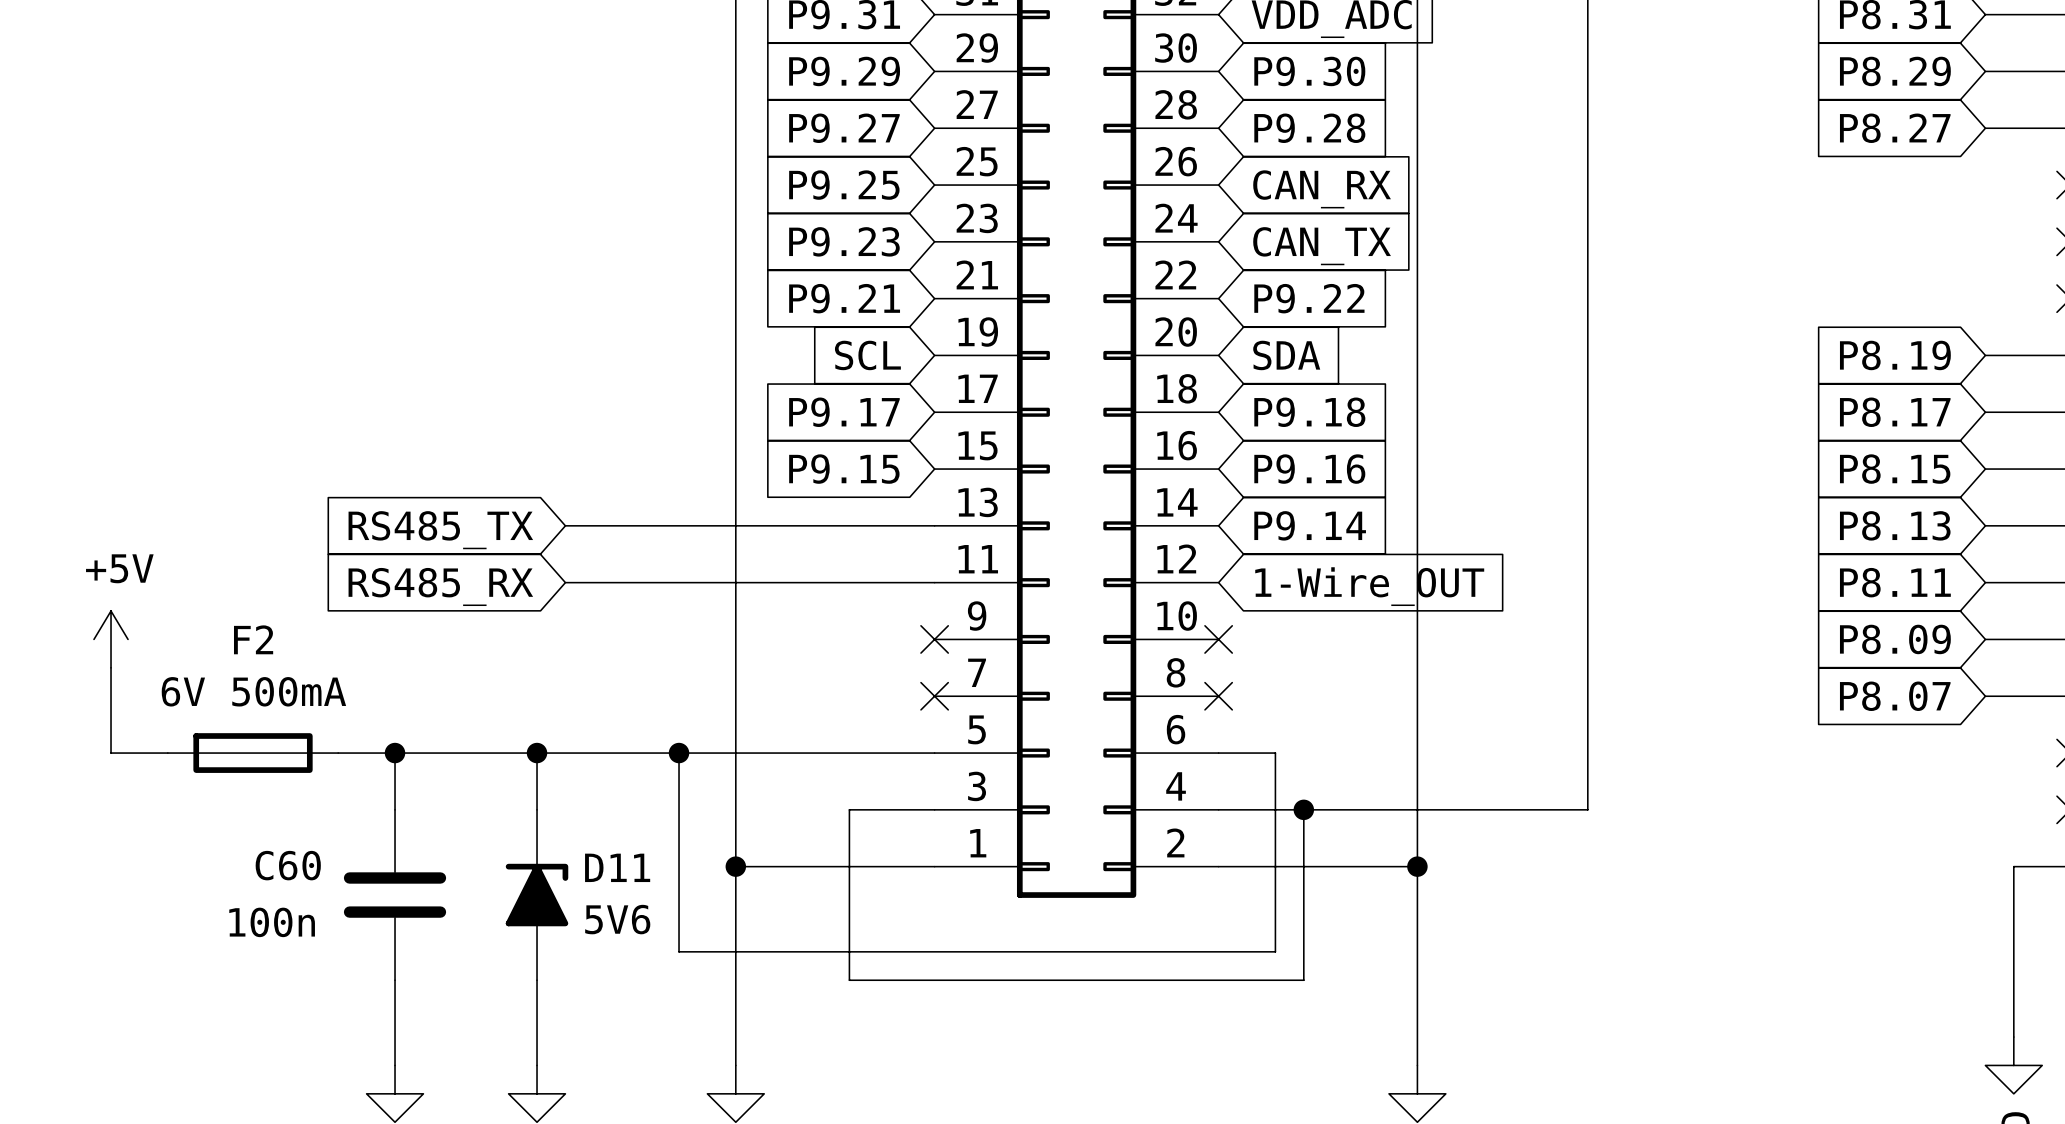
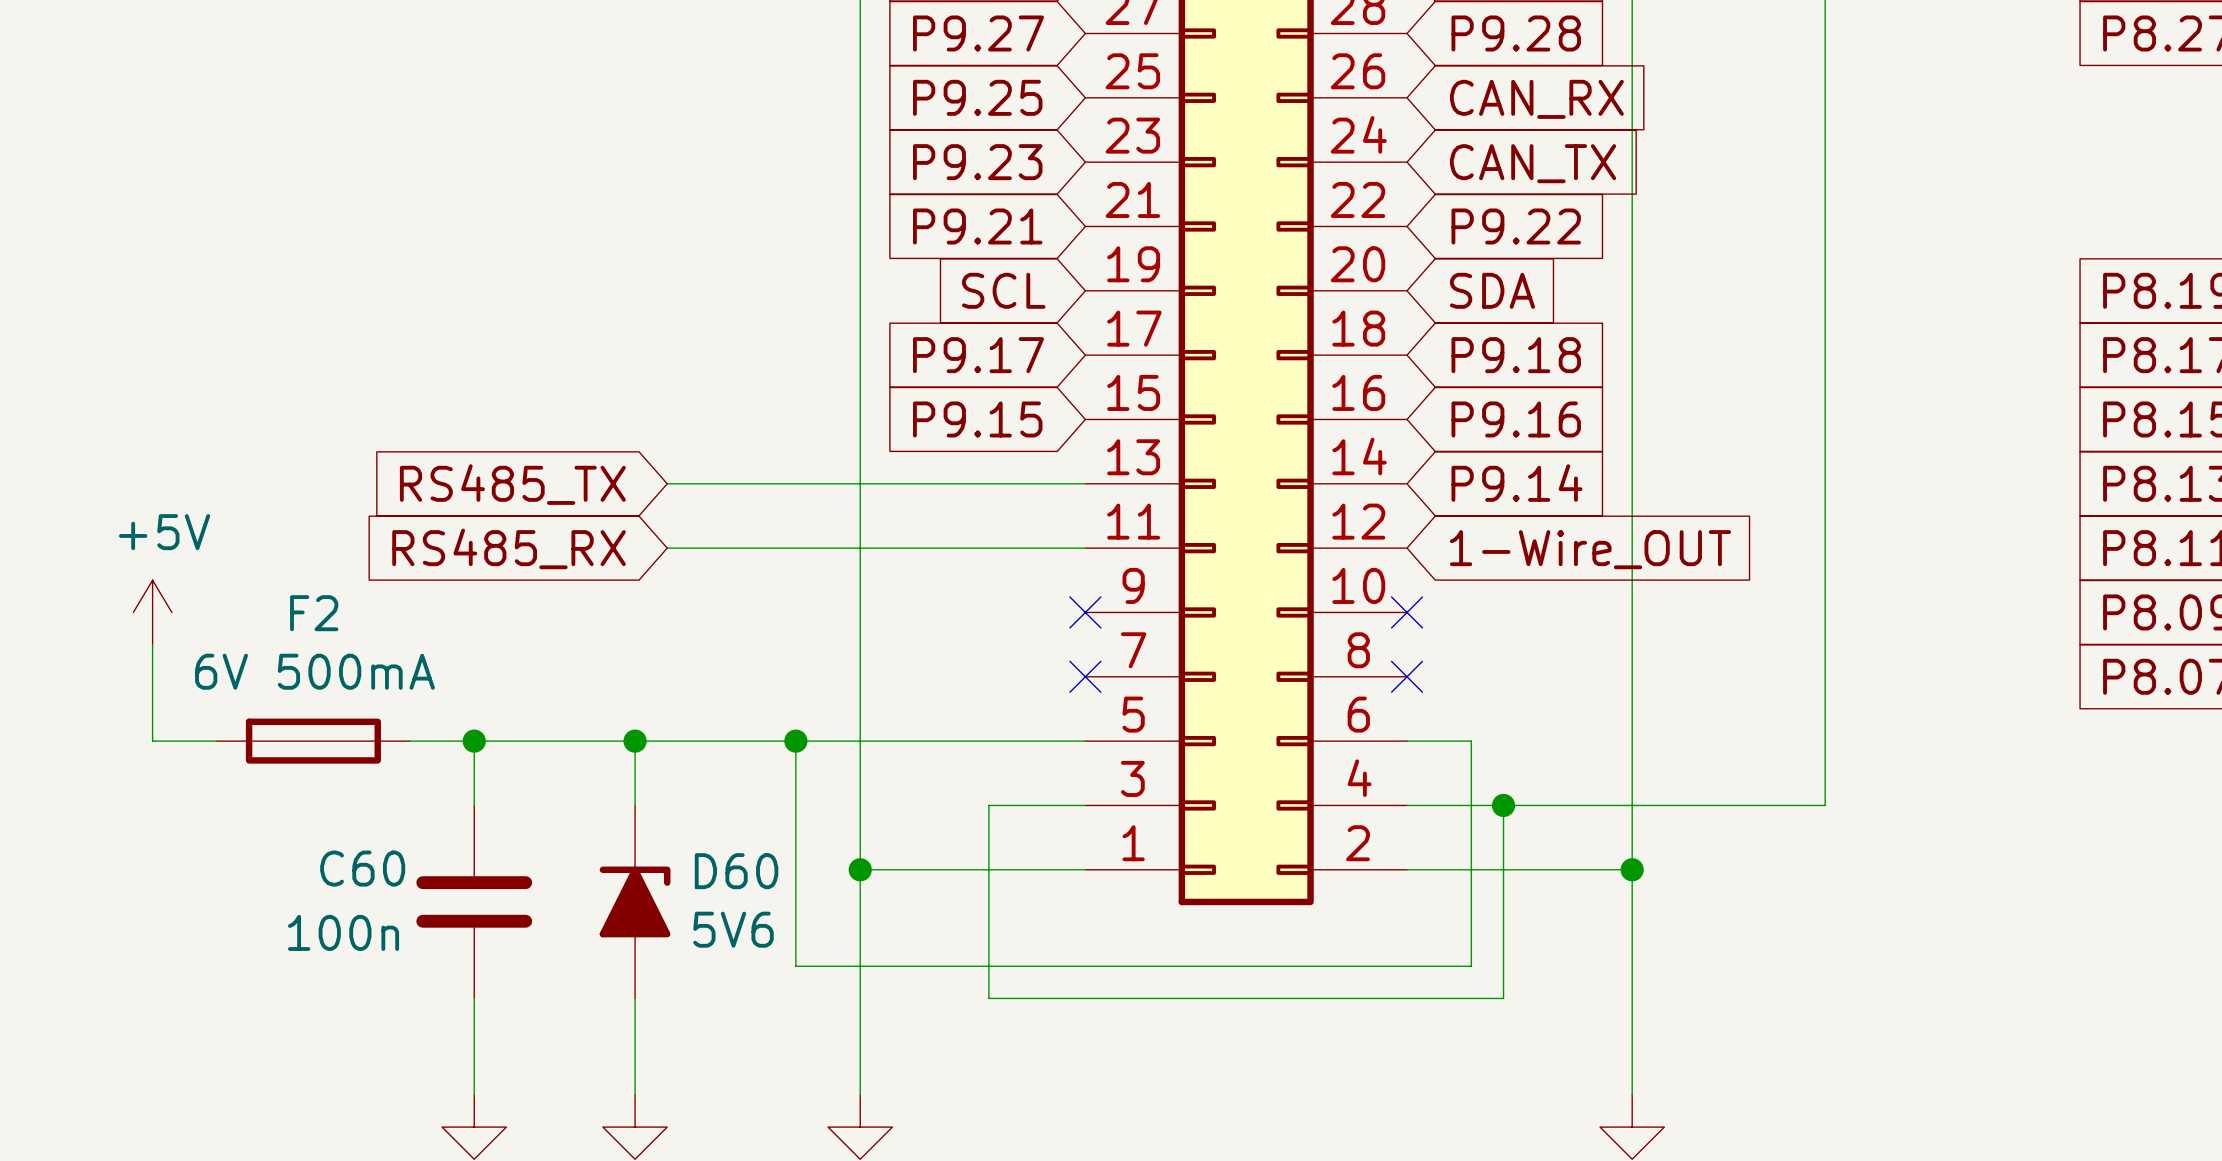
D11 name: D11 (617, 867) -> D60 (736, 871)

